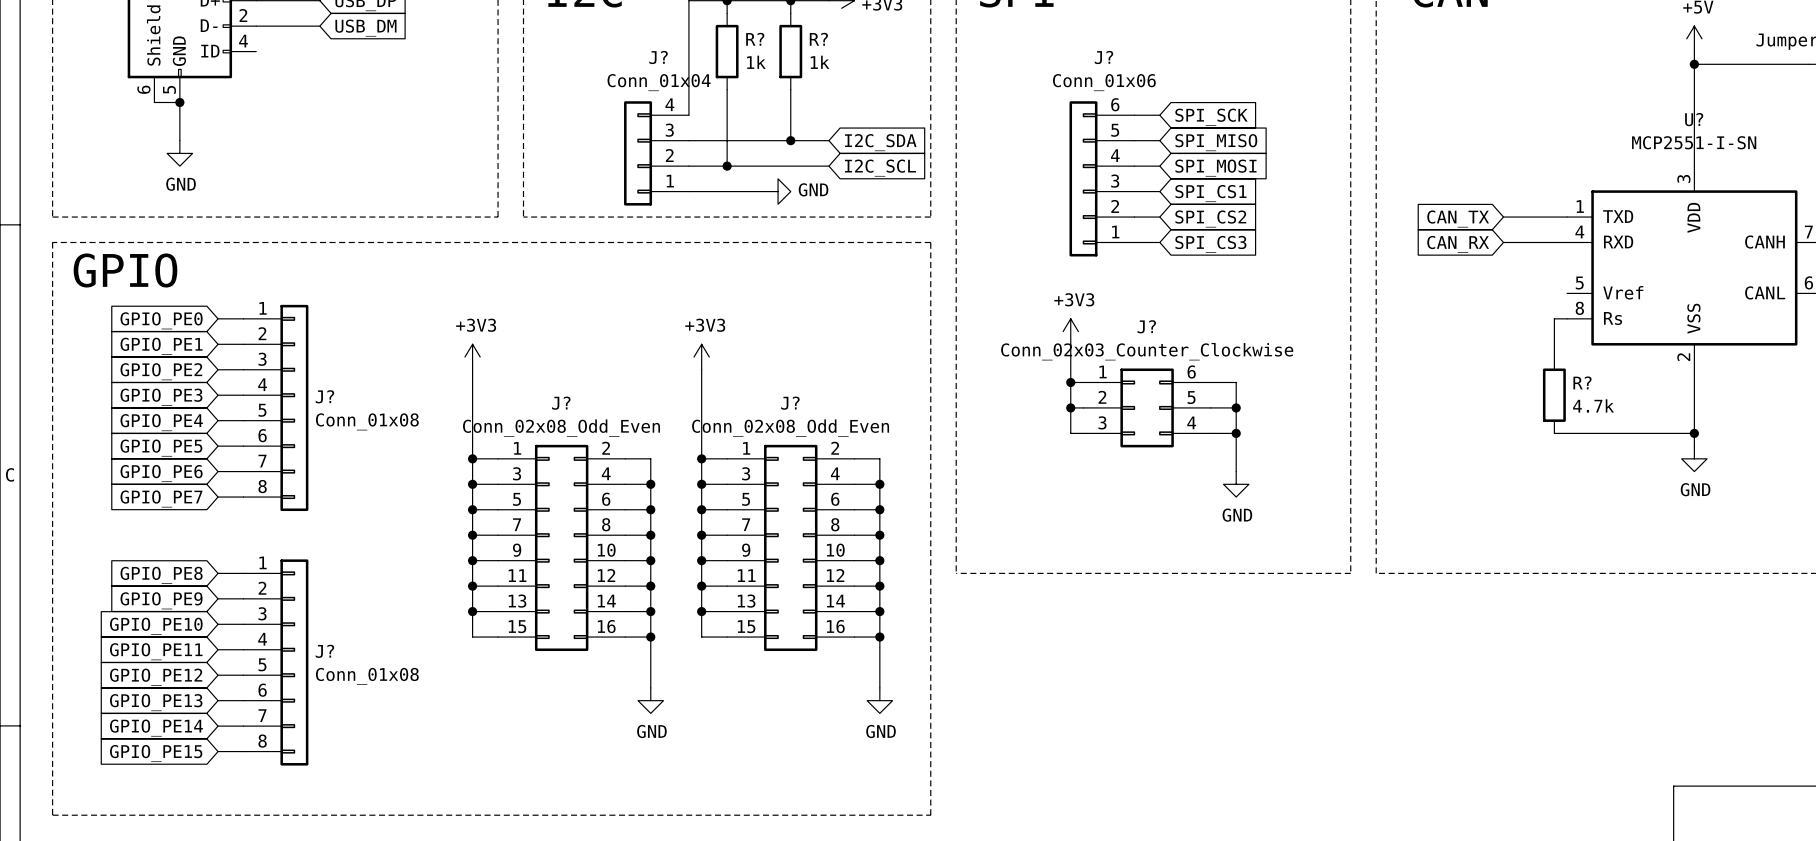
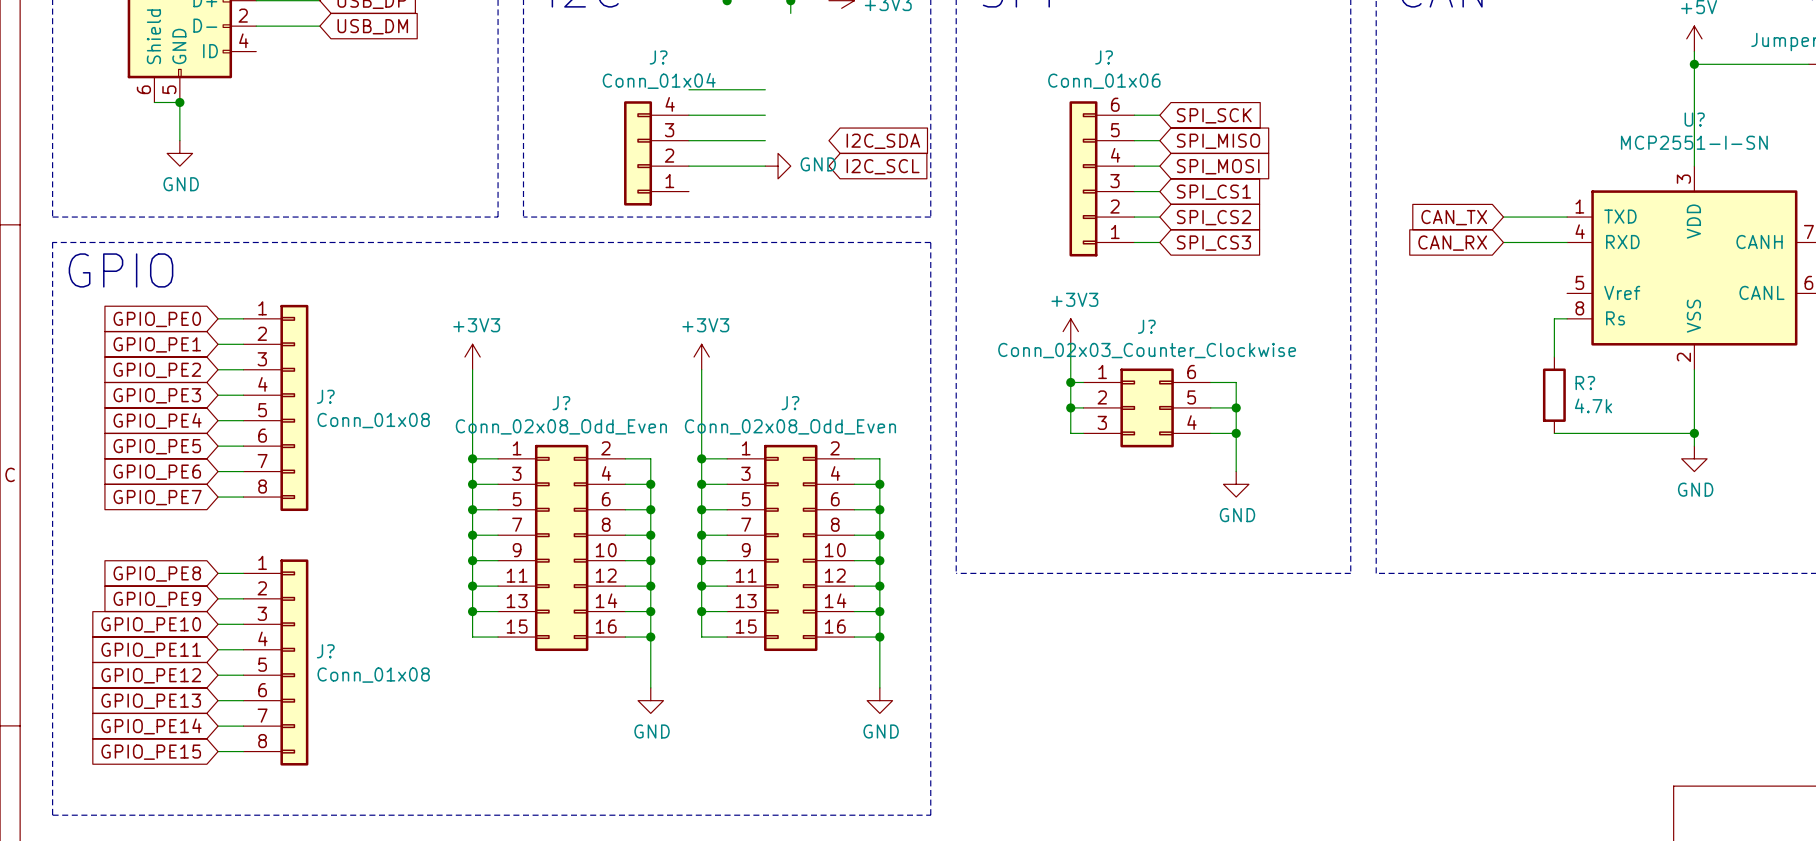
wire: (727, 0) (727, 13) -> none
wire: (828, 0) (688, 0) (688, 115) -> (765, 115) (688, 115)
R?: 1k (727, 51) -> none
R?: 1k (790, 51) -> none
wire: (727, 89) (727, 166) -> none
wire: (790, 89) (790, 140) -> none
wire: (765, 140) (828, 140) -> none
junction: (790, 140) -> none
junction: (727, 166) -> none
wire: (765, 166) (828, 166) -> none
wire: (688, 191) (765, 191) -> (688, 89) (765, 89)
power symbol position: GND (778, 191) -> GND (778, 166)

